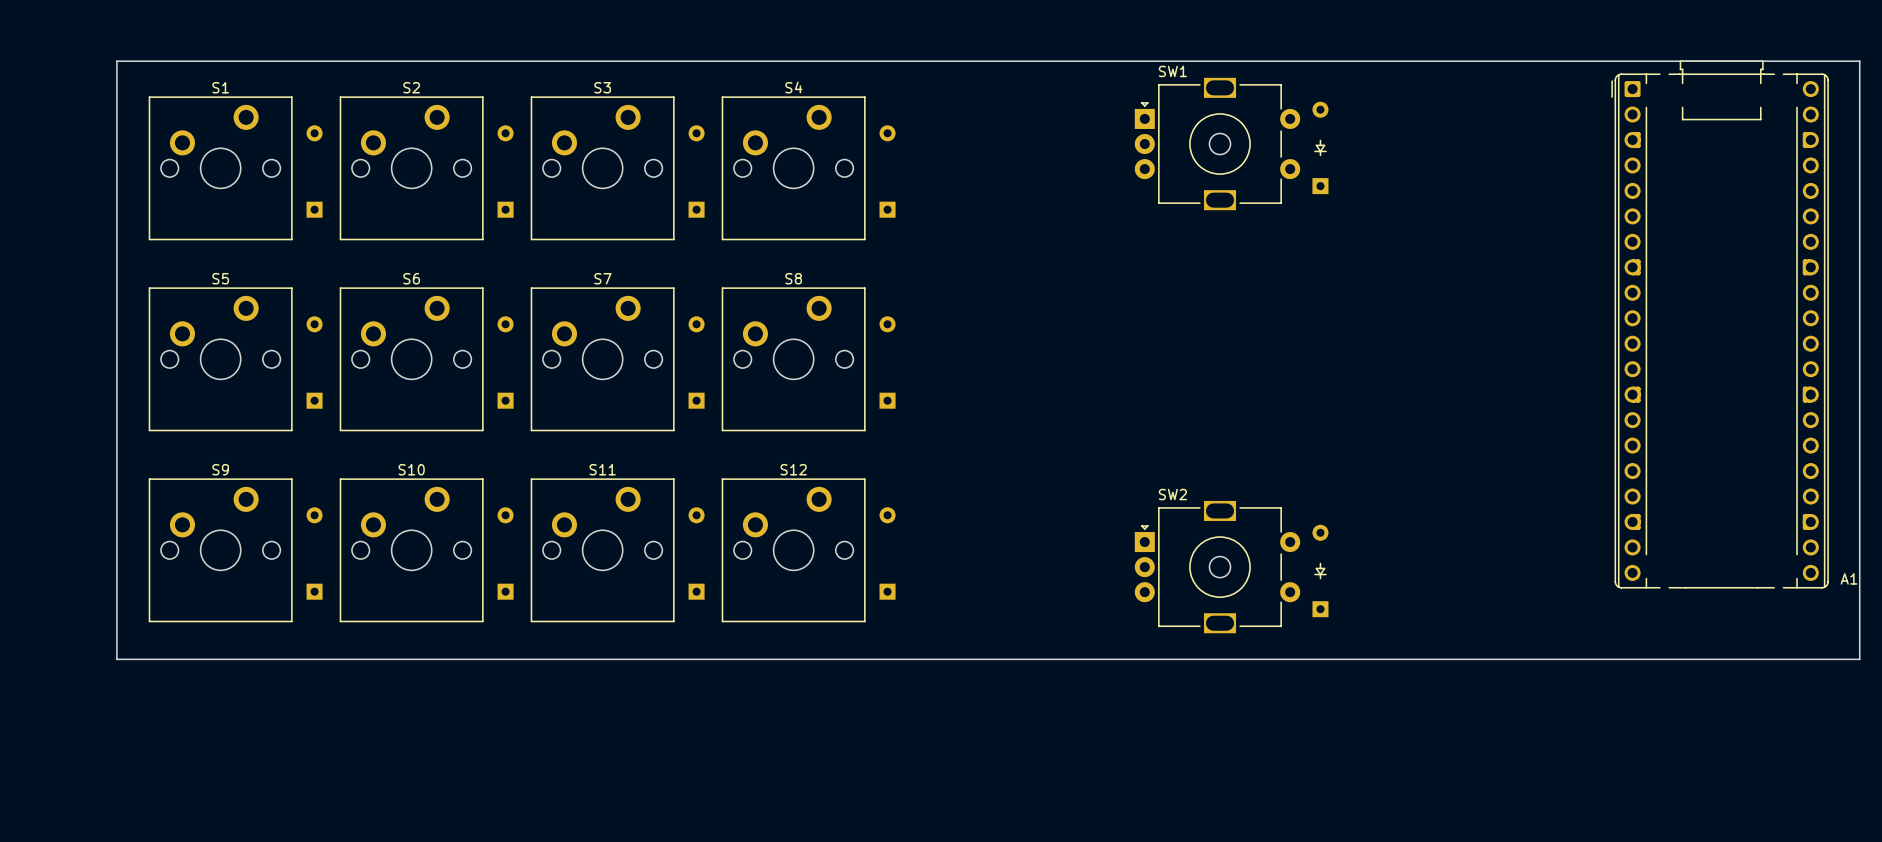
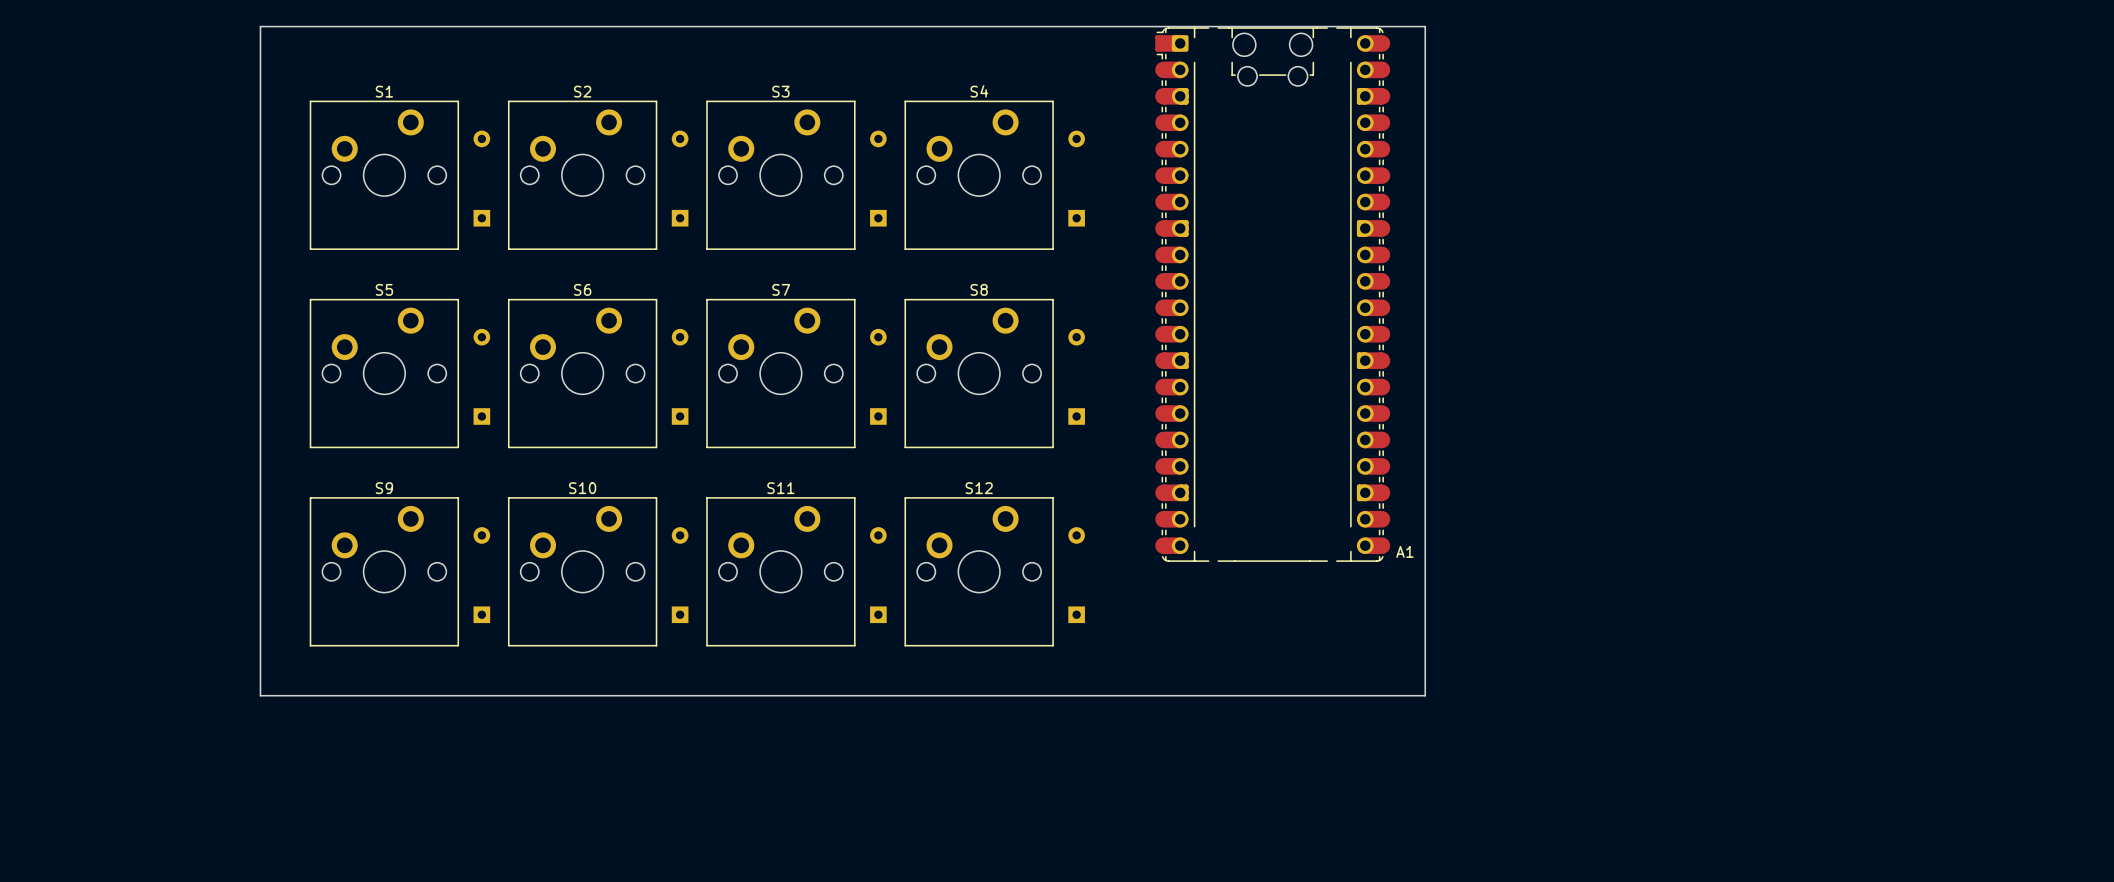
A1 footprint: [1611, 60, 1829, 589] -> [1155, 27, 1391, 562]
board edge: (116, 61) (1859, 61) (1859, 659) (116, 659) (116, 61) -> (260, 26) (260, 695) (1425, 695) (1425, 26) (260, 26)
SW1: (1217, 144) -> none
part: (1320, 147) -> none
SW2: (1217, 567) -> none
part: (1320, 571) -> none

